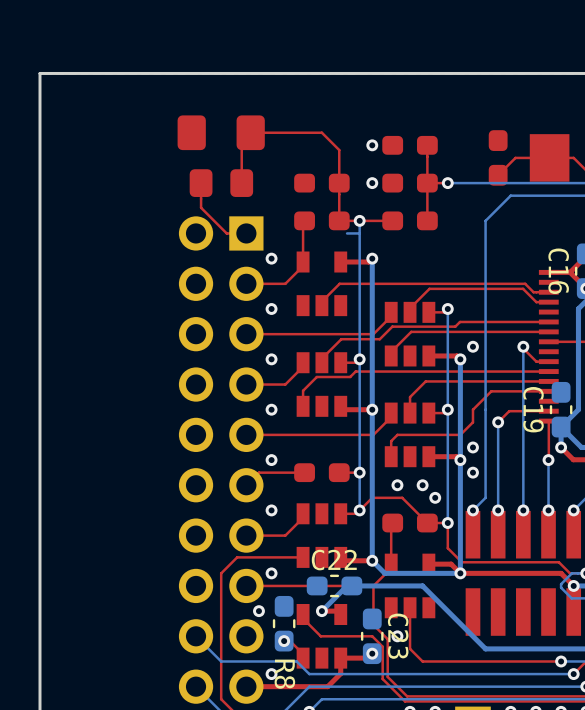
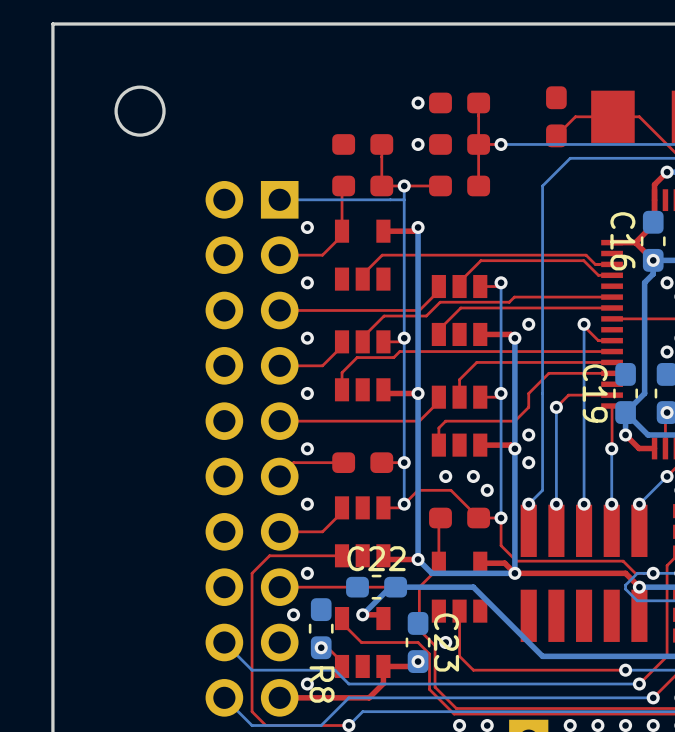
round board edge: none -> [114, 85, 166, 137]
part: (221, 132) -> none
top track: (201, 183) (201, 207) (226, 233) (246, 233) -> none
part: (221, 183) -> none
top track: (339, 183) (339, 150) (321, 132) (250, 132) (241, 141) (241, 183) -> none
bottom track: none -> (390, 199) (279, 199)

